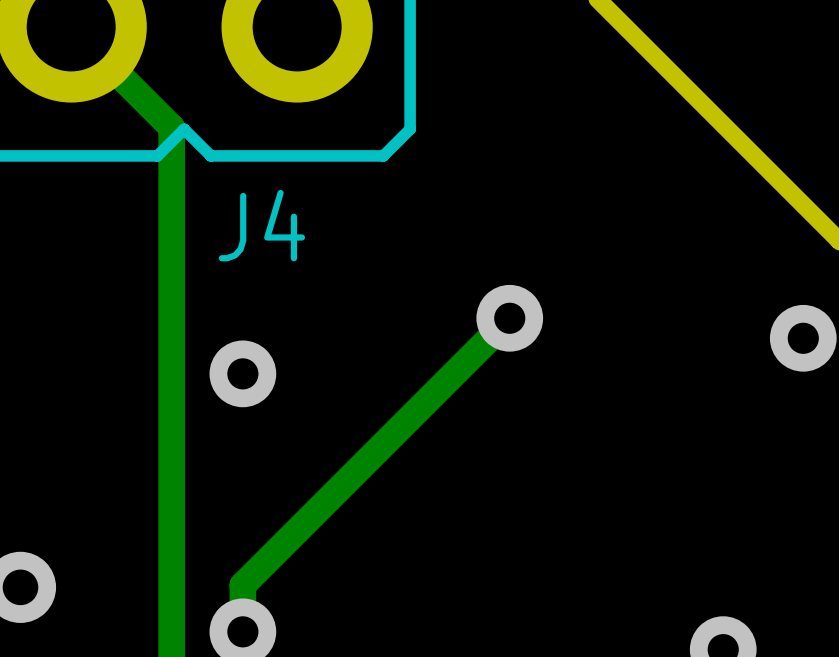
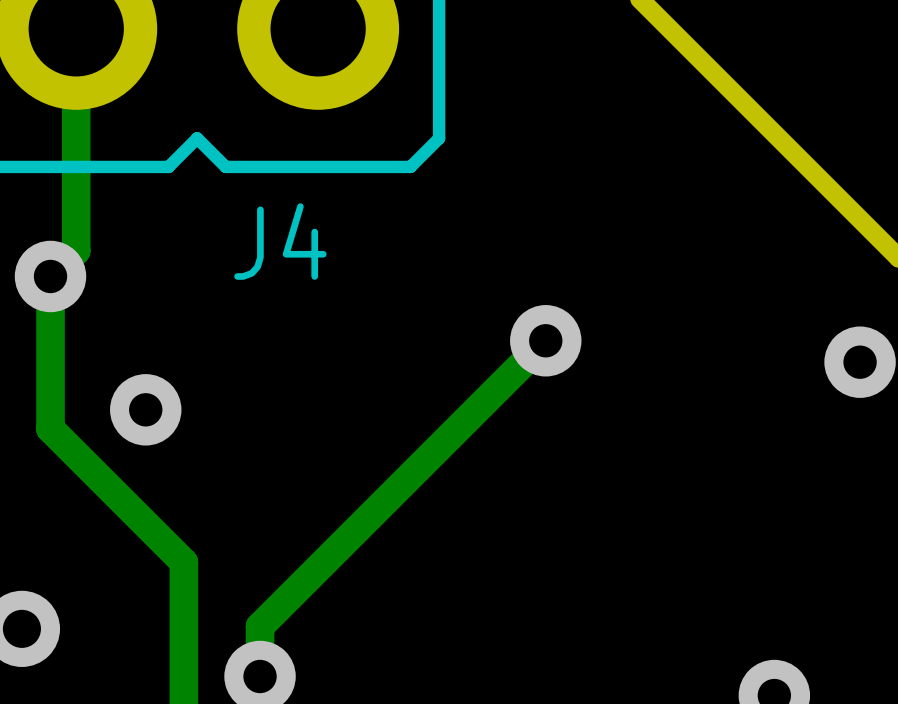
track: (71, 26) (171, 127) (171, 525) -> (76, 28) (76, 250) (50, 276) (50, 428) (183, 562)
via: none -> (50, 276)
via position: (242, 373) -> (145, 409)

